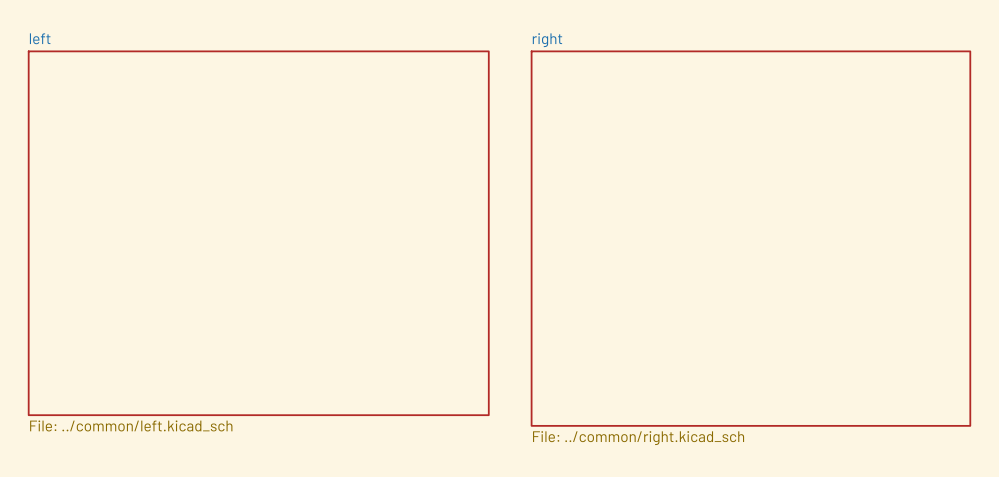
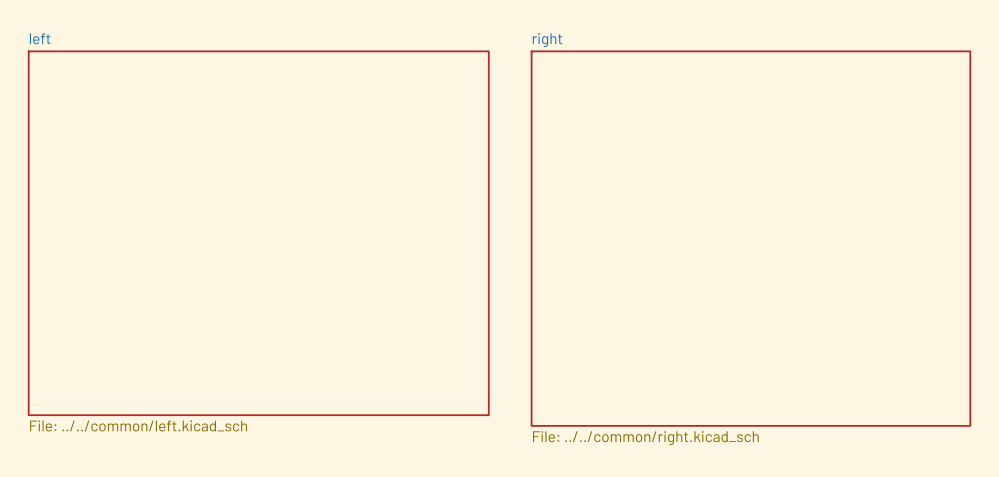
sheet left value: File: ../common/left.kicad_sch (131, 425) -> File: ../../common/left.kicad_sch (138, 425)
sheet right value: File: ../common/right.kicad_sch (638, 438) -> File: ../../common/right.kicad_sch (645, 438)

